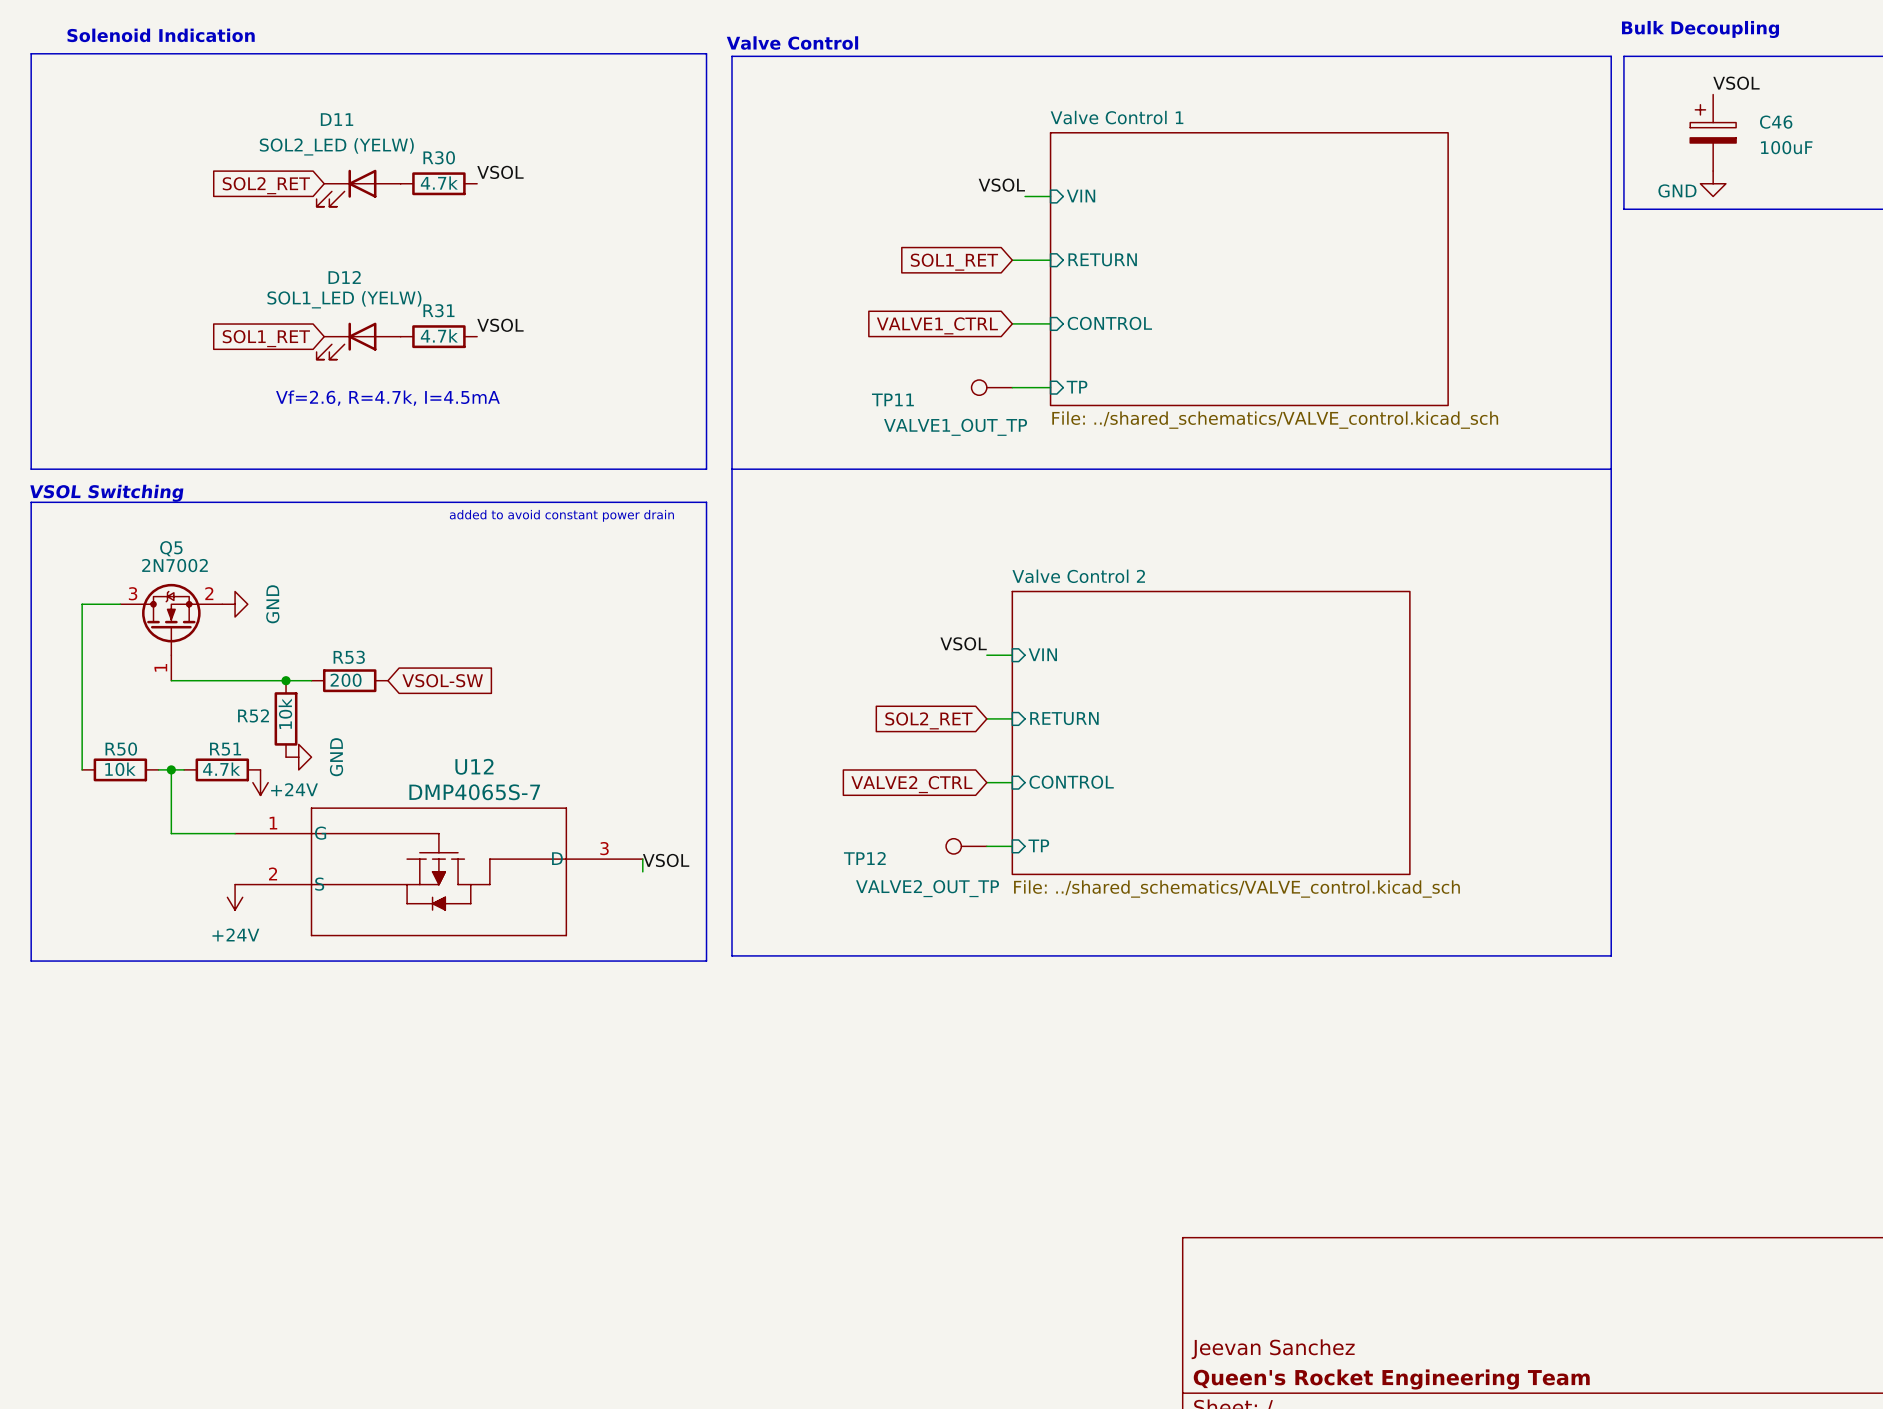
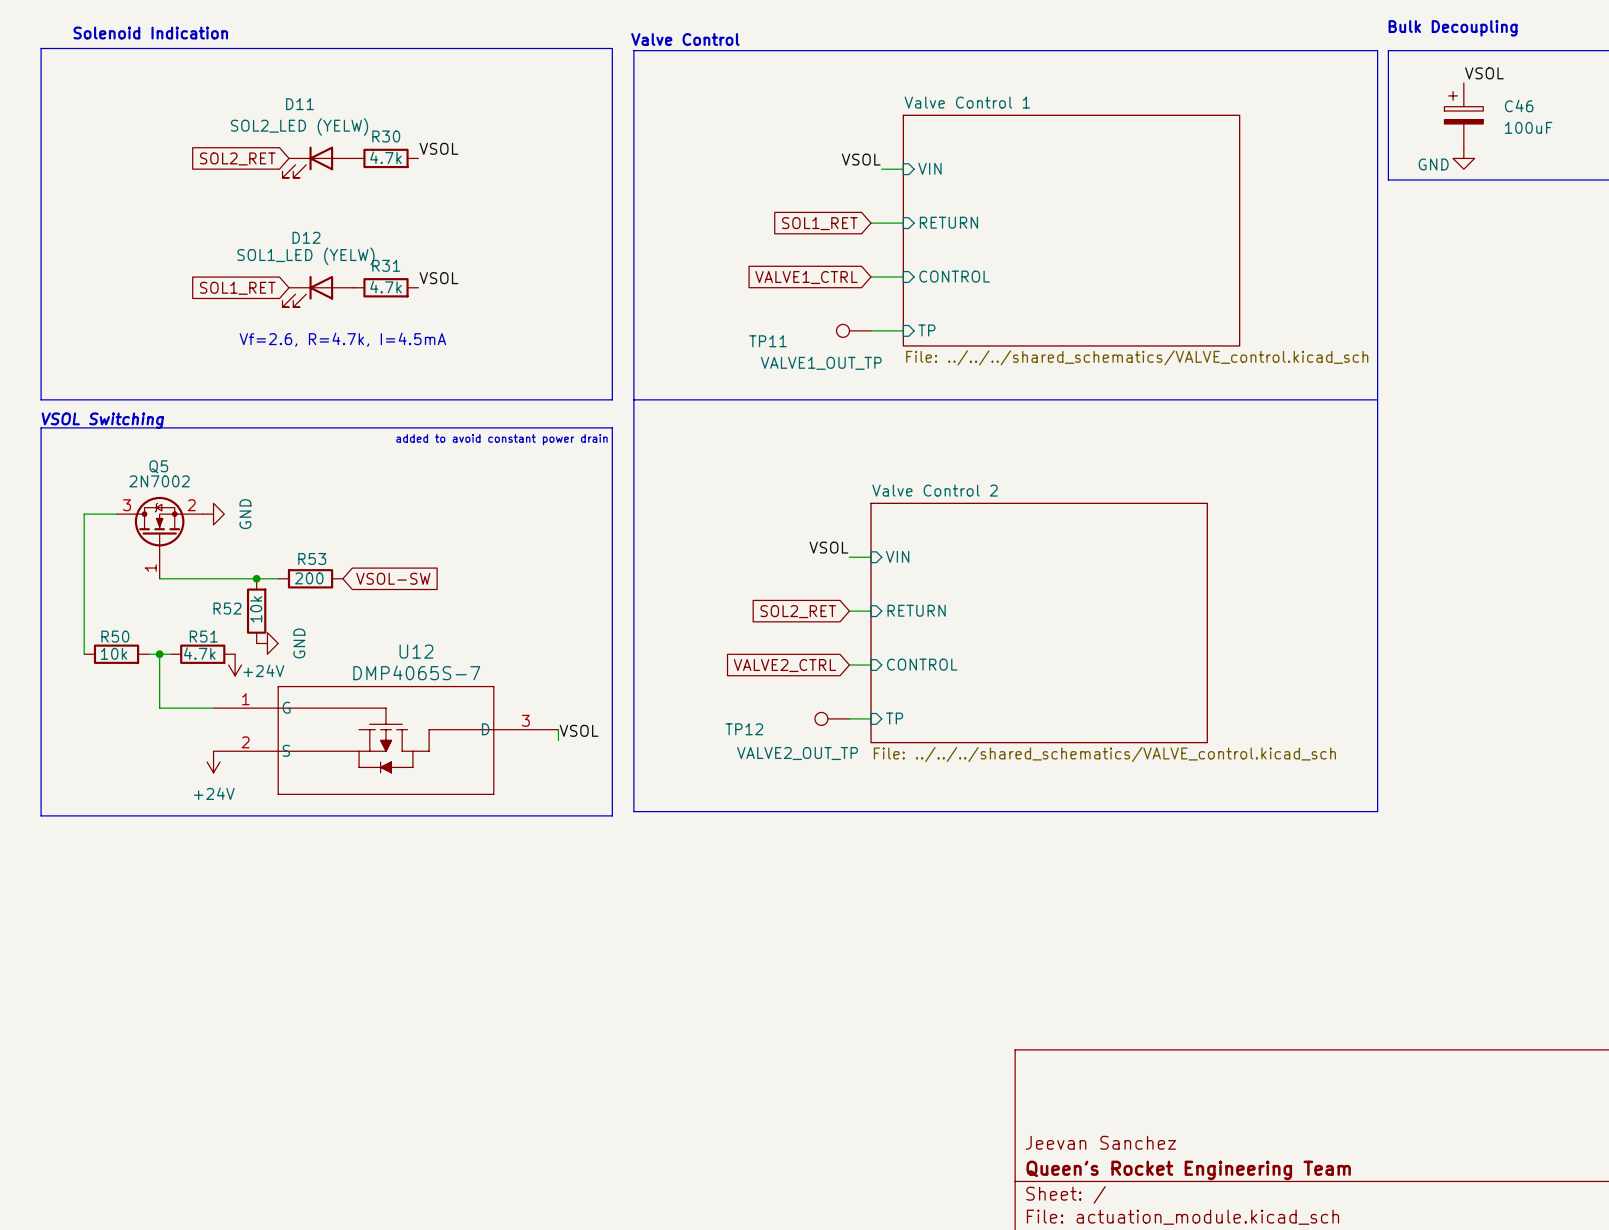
sheet Valve Control 1 value: File: ../shared_schematics/VALVE_control.kicad_sch (1275, 420) -> File: ../../../shared_schematics/VALVE_control.kicad_sch (1137, 357)
sheet Valve Control 2 value: File: ../shared_schematics/VALVE_control.kicad_sch (1236, 889) -> File: ../../../shared_schematics/VALVE_control.kicad_sch (1104, 754)

